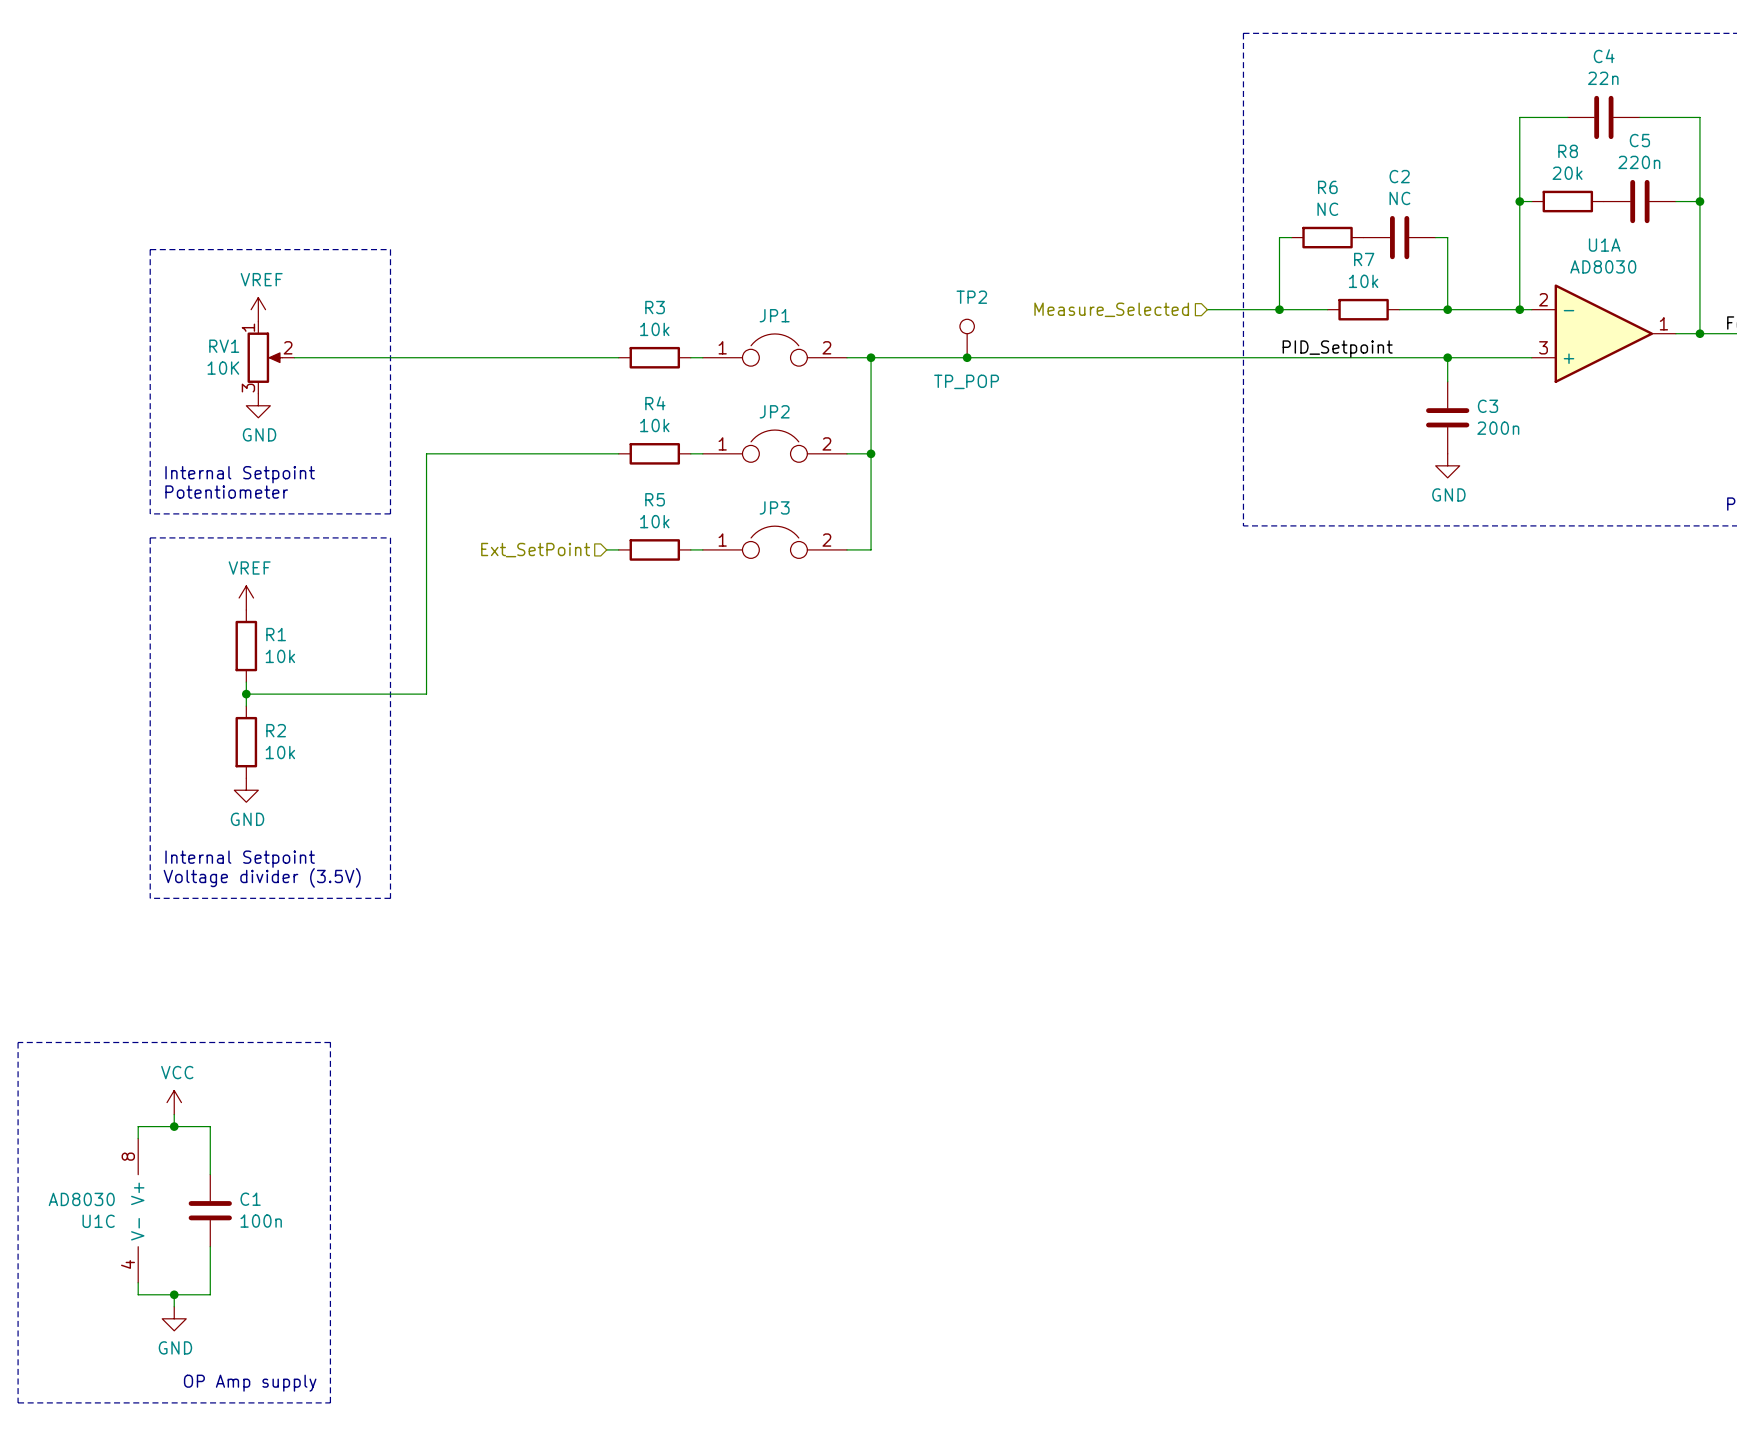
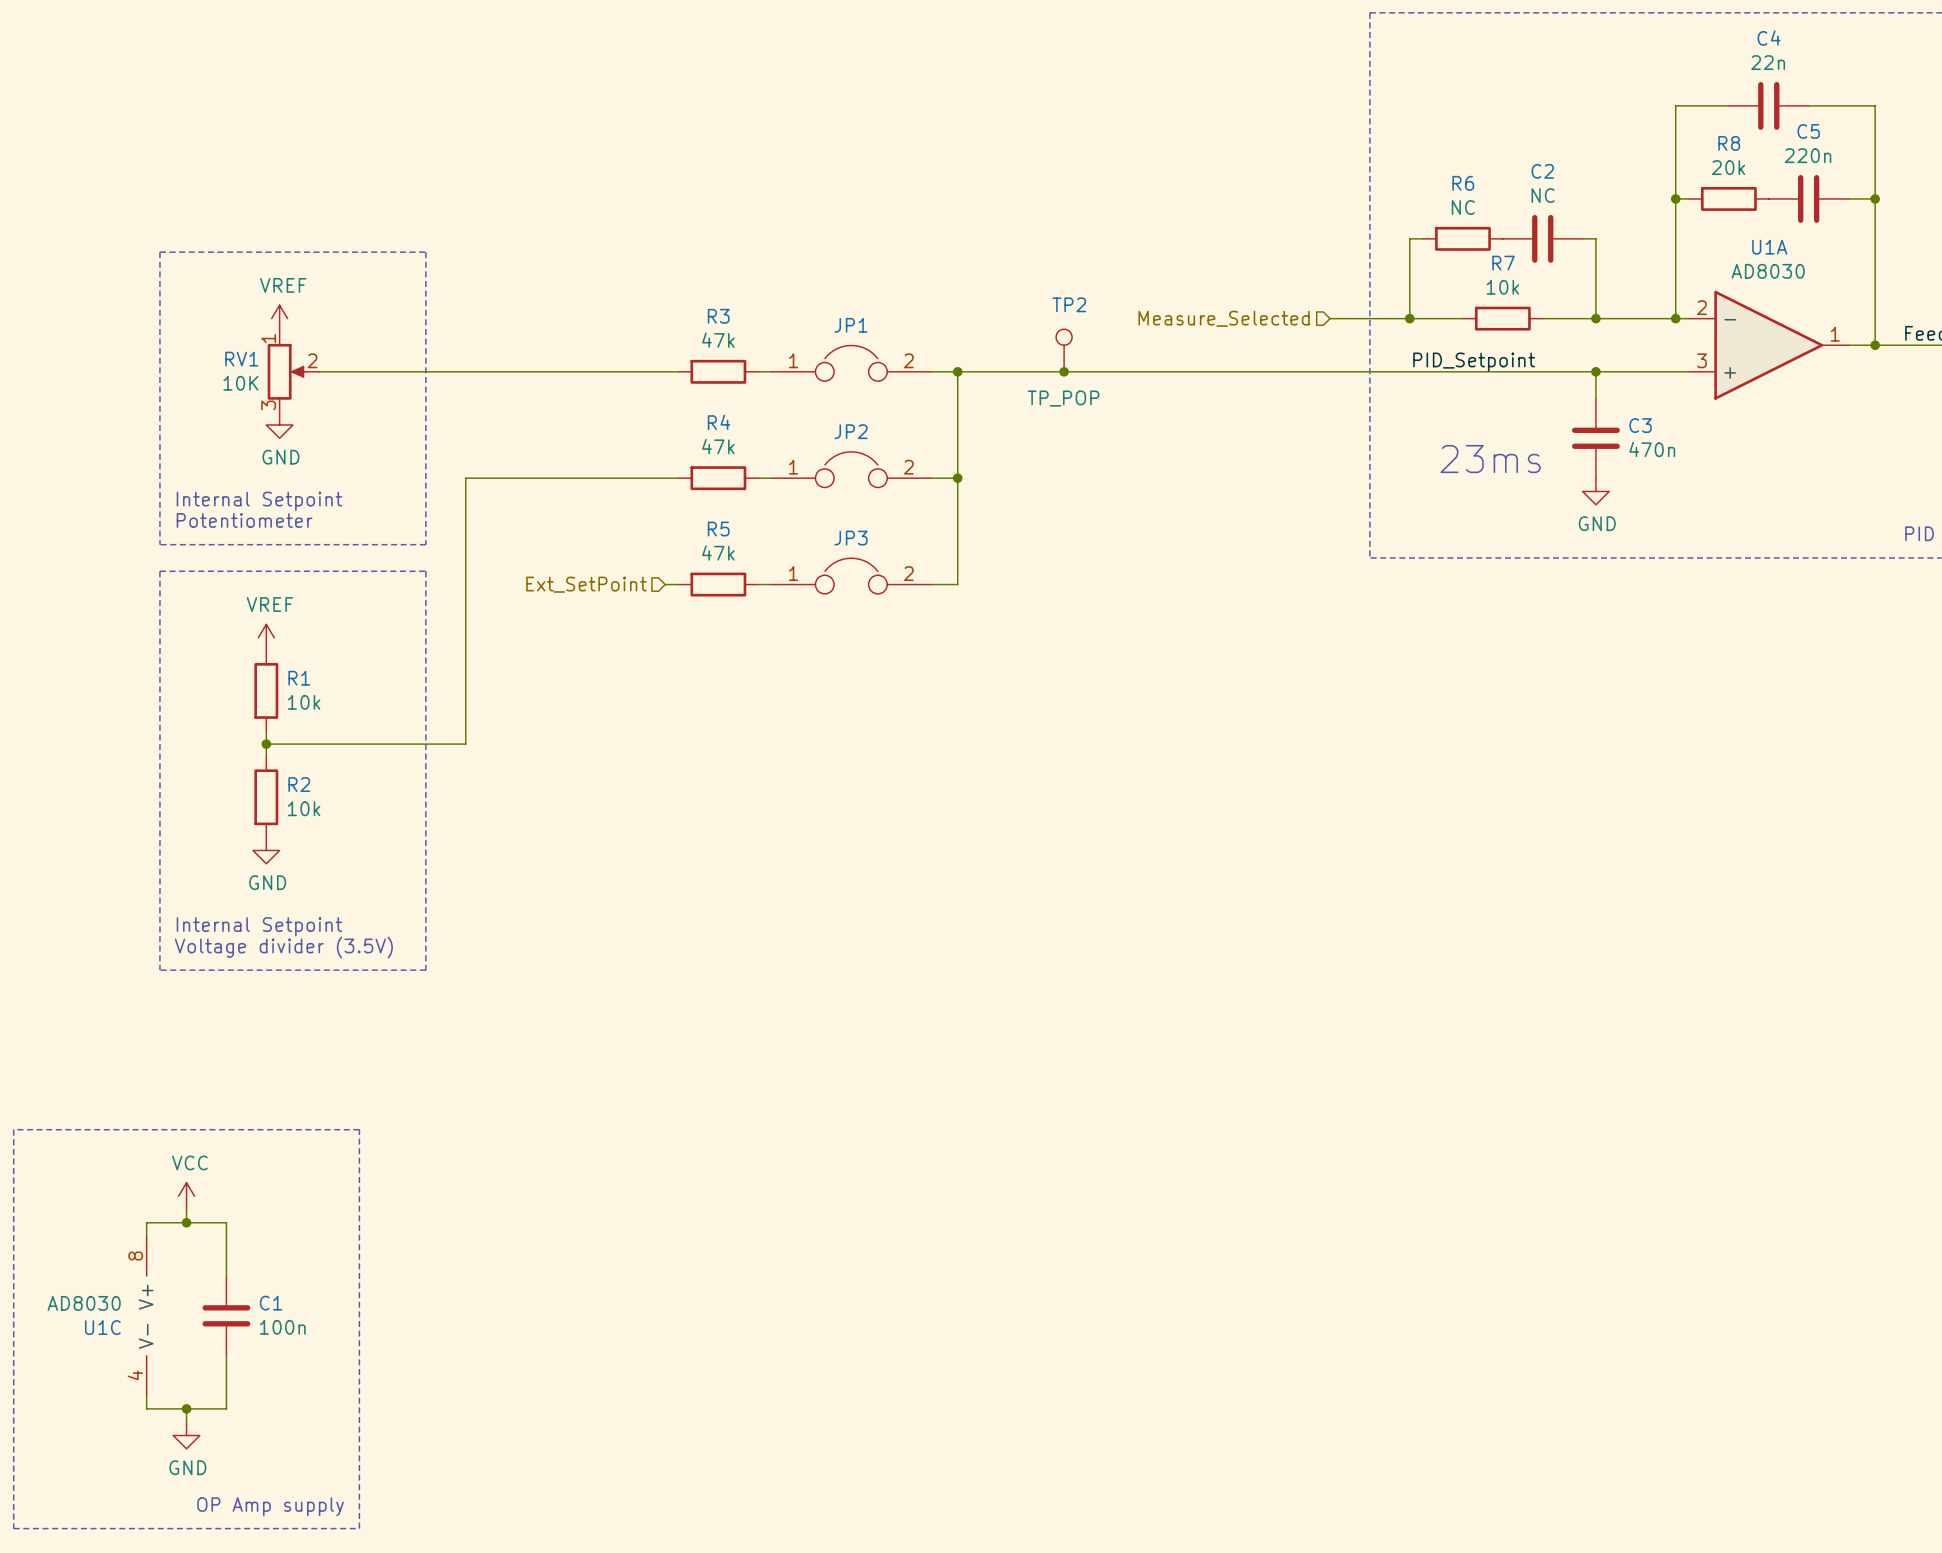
R3 value: 10k (654, 329) -> 47k (718, 340)
R4 value: 10k (654, 425) -> 47k (718, 446)
C3 value: 200n (1498, 428) -> 470n (1652, 449)
text: none -> 23ms (1490, 459)
R5 value: 10k (654, 521) -> 47k (718, 552)

